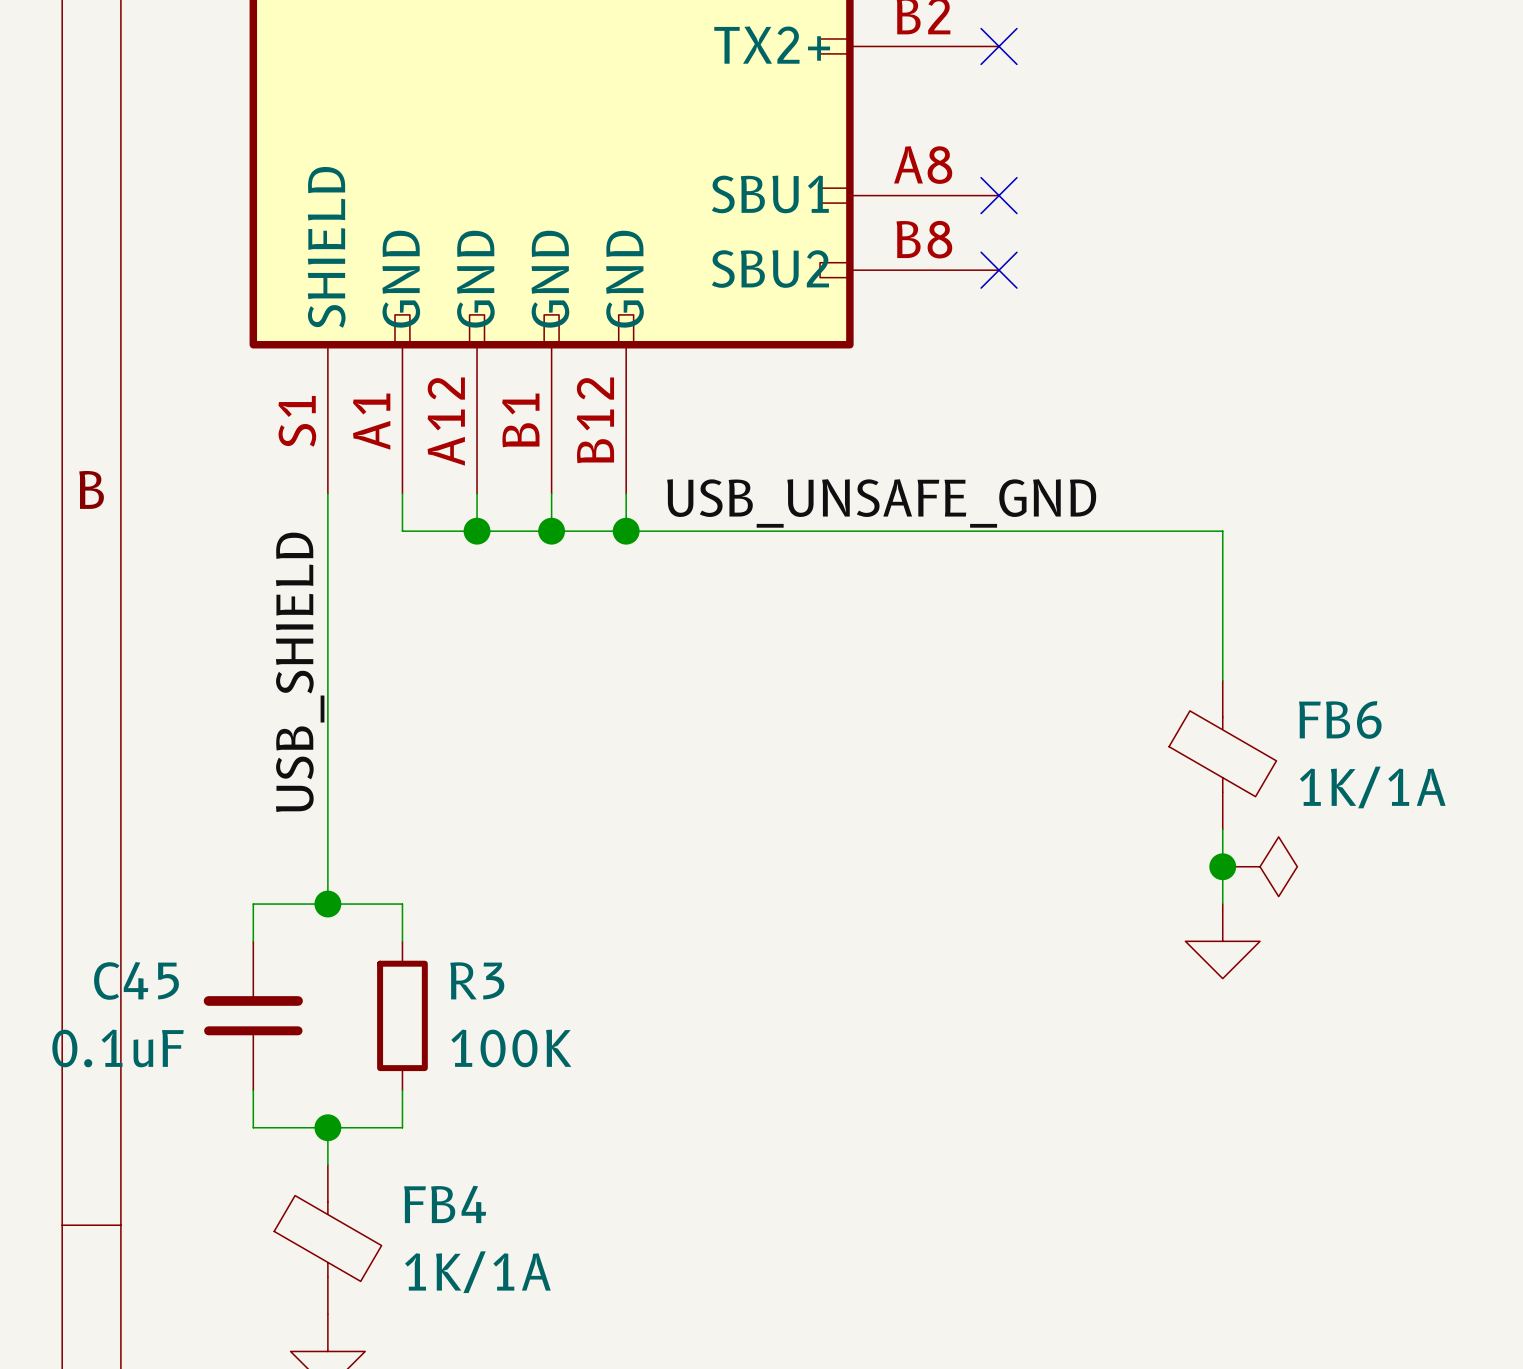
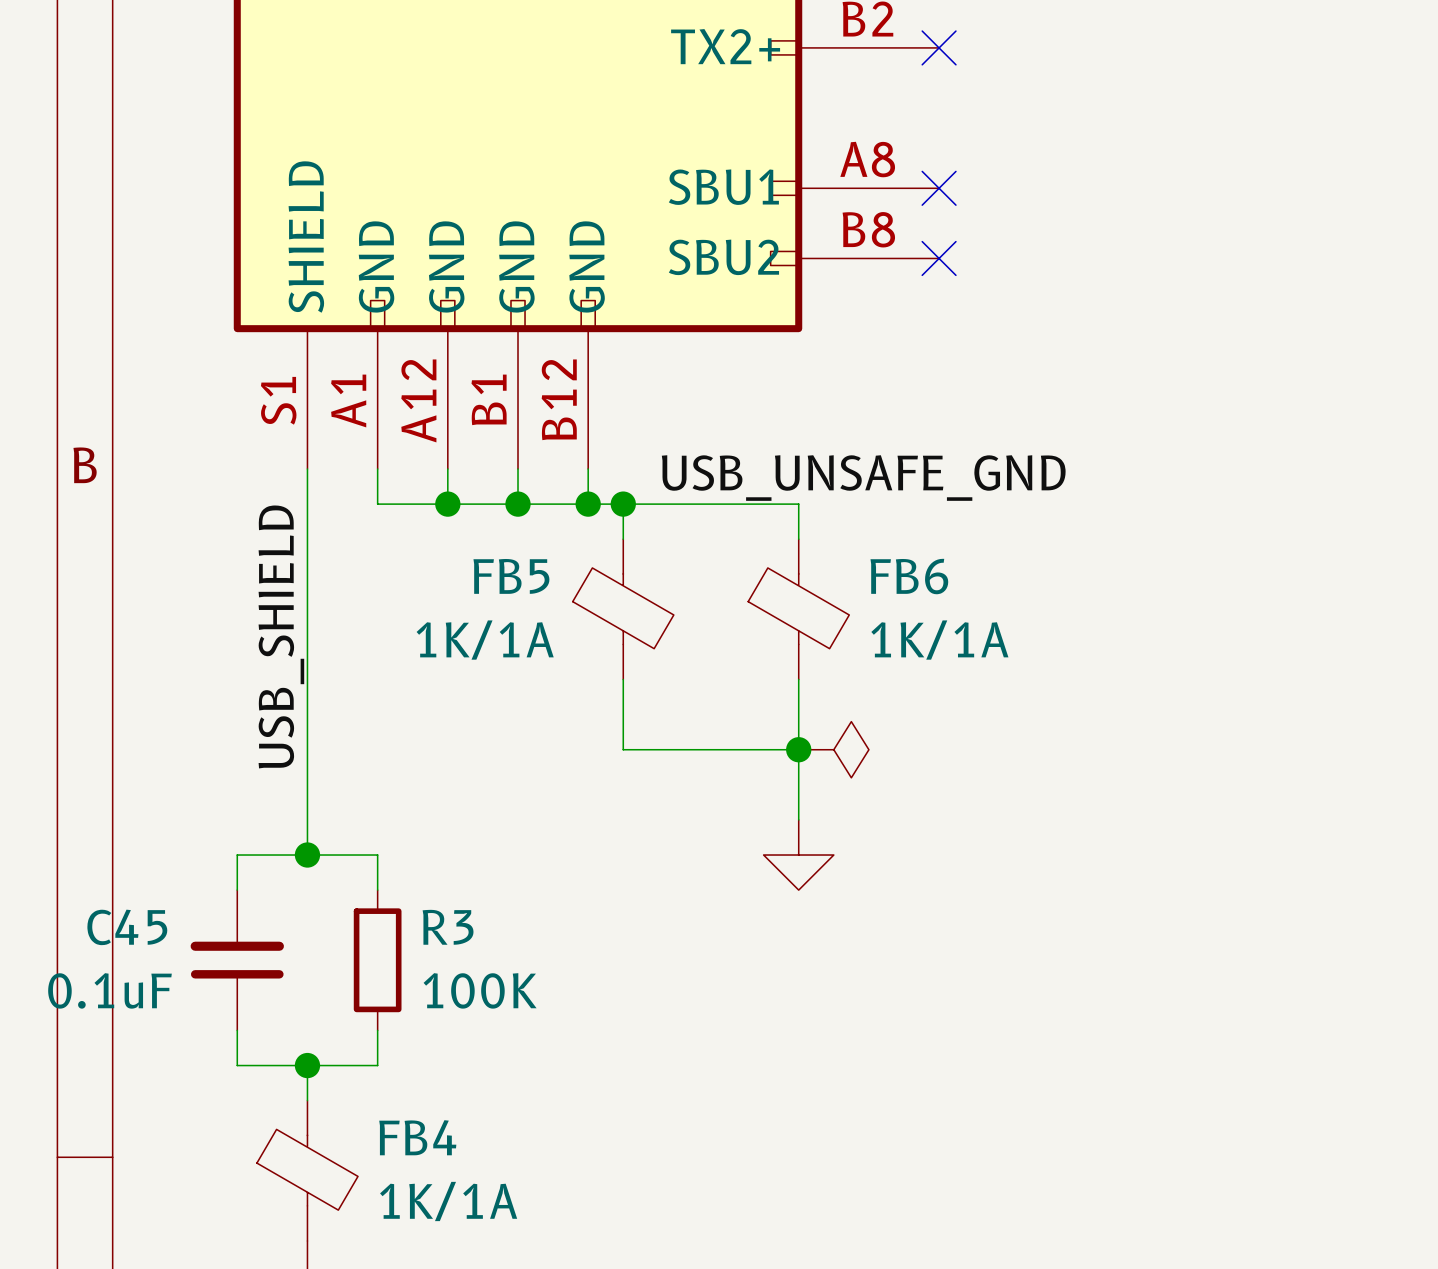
label position: USB_UNSAFE_GND (881, 503) -> USB_UNSAFE_GND (863, 478)
wire: none -> (623, 504) (623, 539)
junction: none -> (623, 504)
wire: (849, 531) (1222, 531) (1222, 680) -> (798, 504) (798, 539)
FB5: none -> 1K/1A (623, 609)
wire: none -> (623, 679) (623, 749) (798, 749)
wire: none -> (798, 679) (798, 819)
FB6 position: (1222, 754) -> (798, 609)
junction: none -> (798, 749)
wire: (1222, 829) (1222, 904) -> none
junction: (1222, 866) -> none
power symbol position: (1260, 866) -> (833, 749)
power symbol position: (1222, 941) -> (798, 855)

